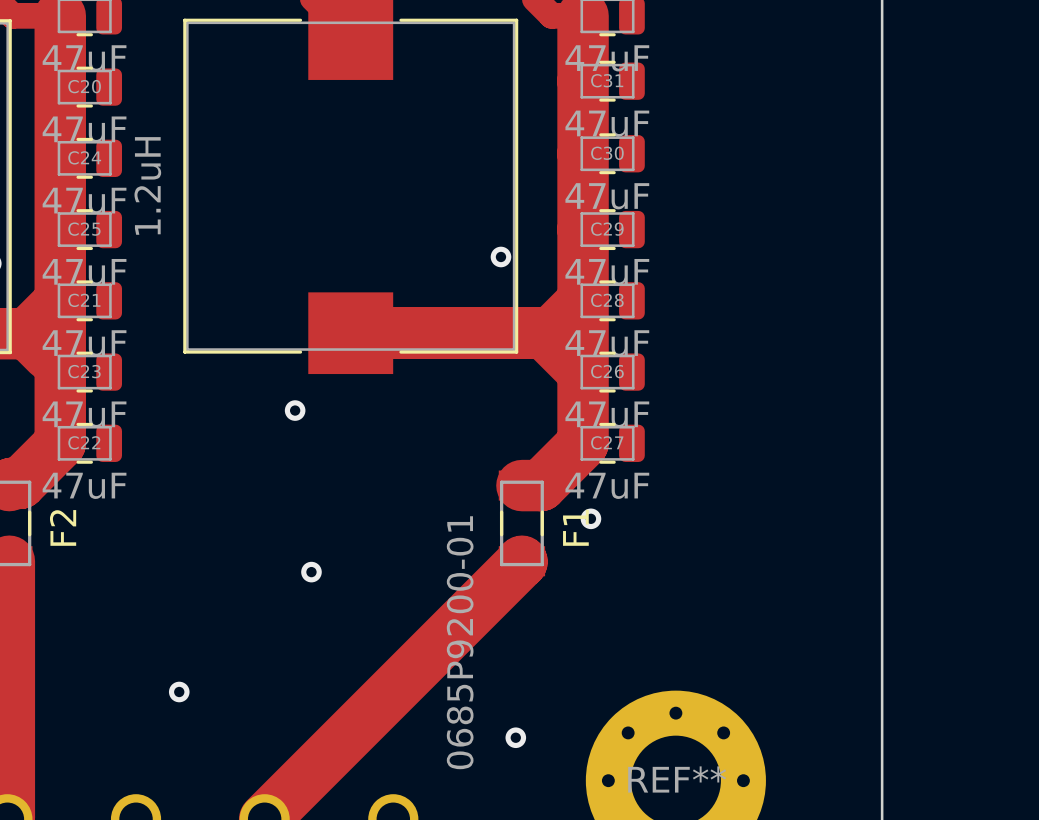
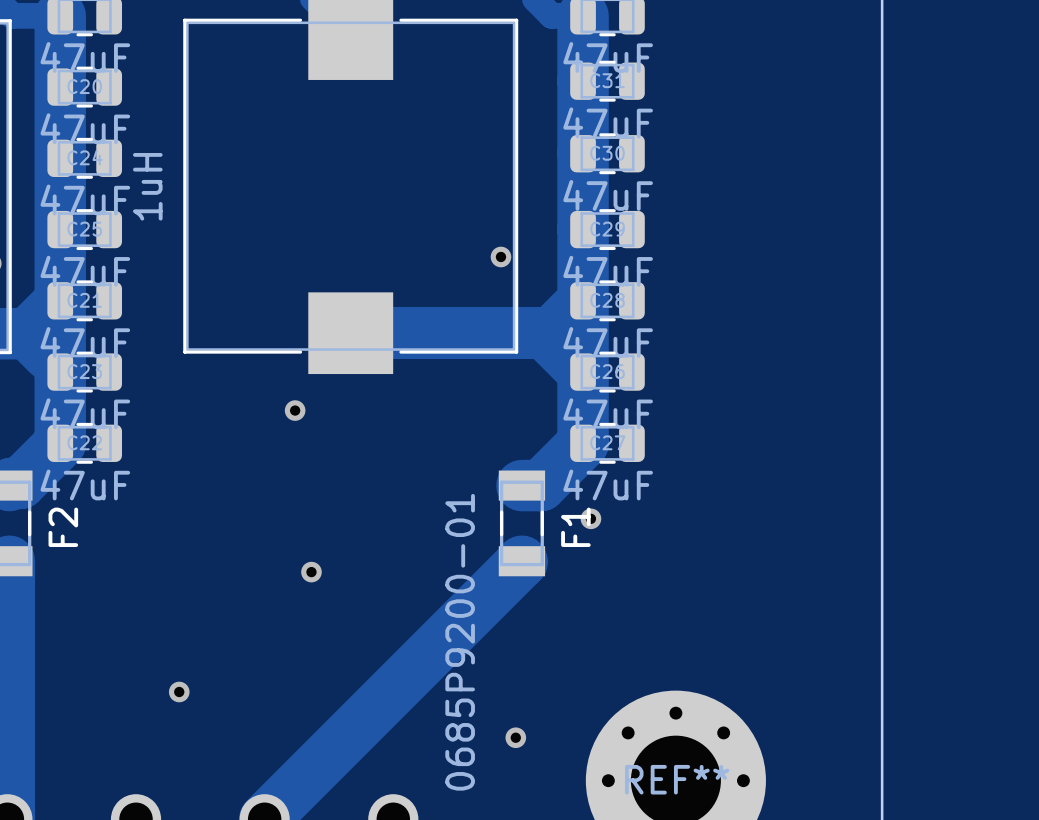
part value: 1.2uH (147, 185) -> 1uH (147, 186)

